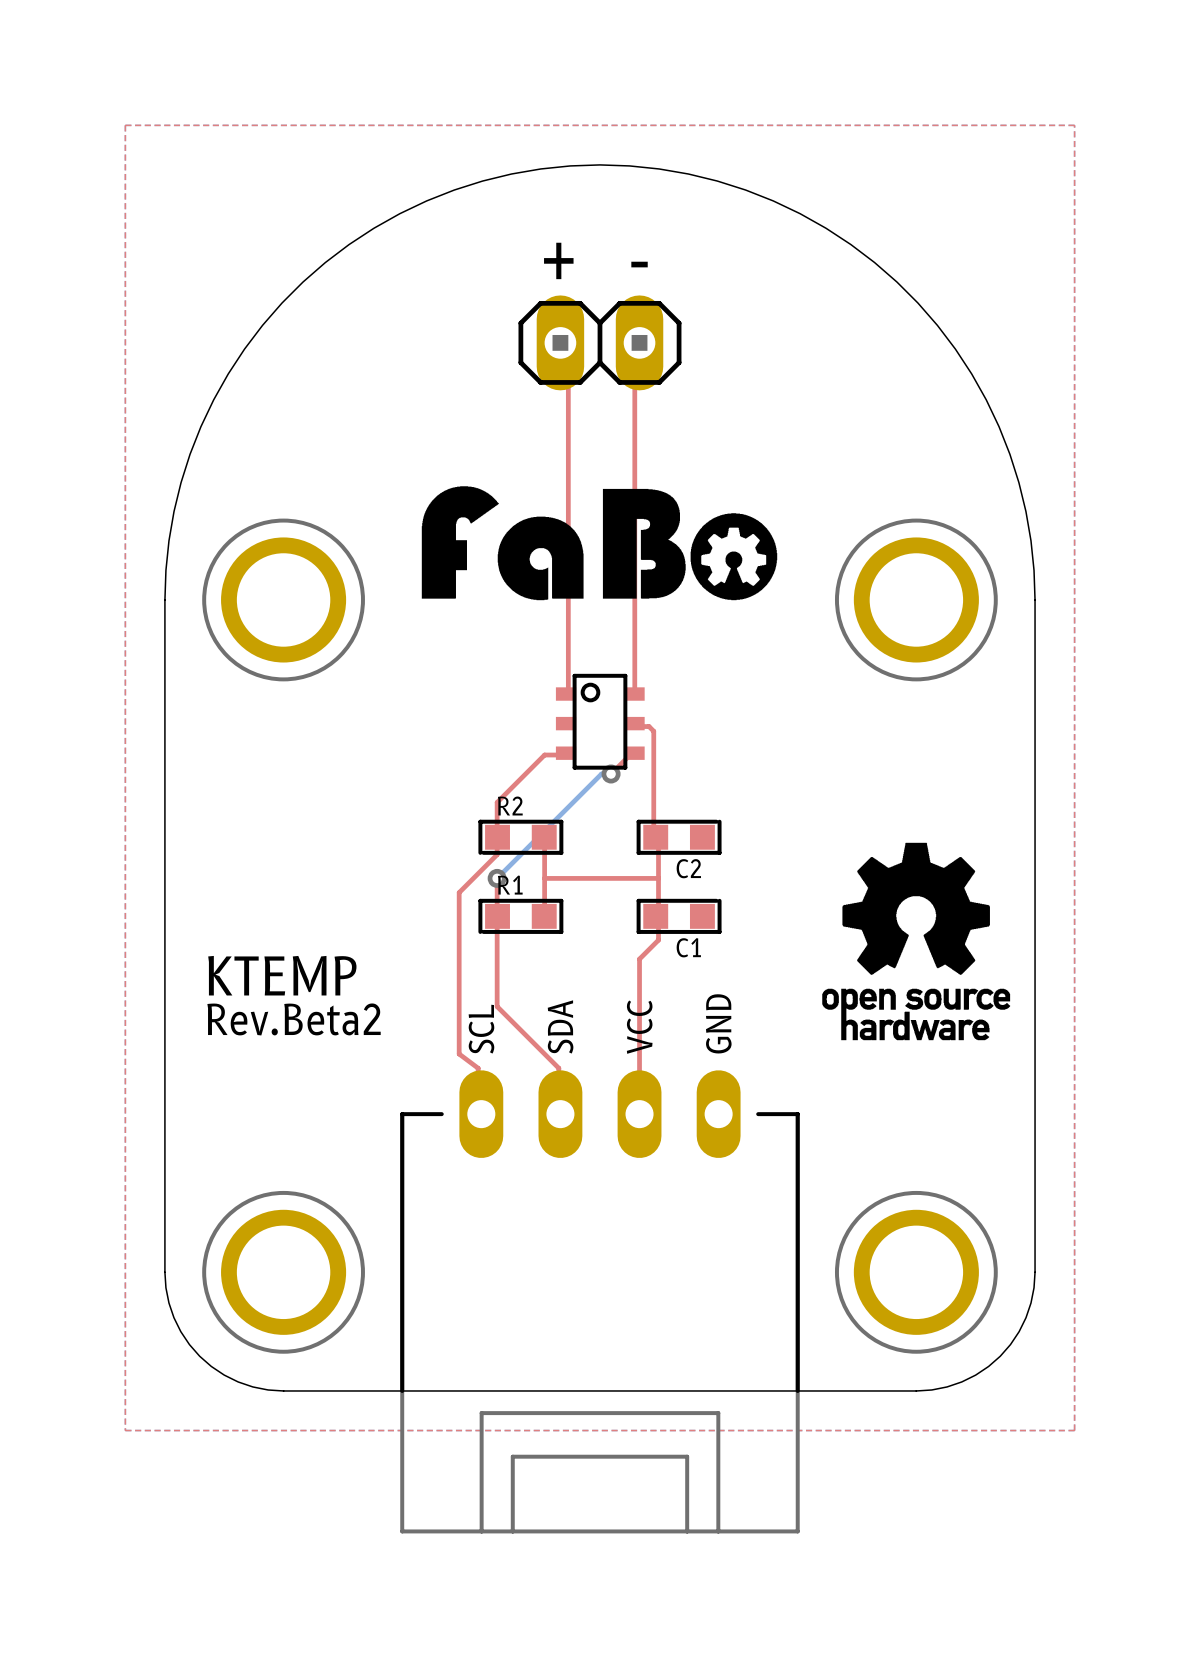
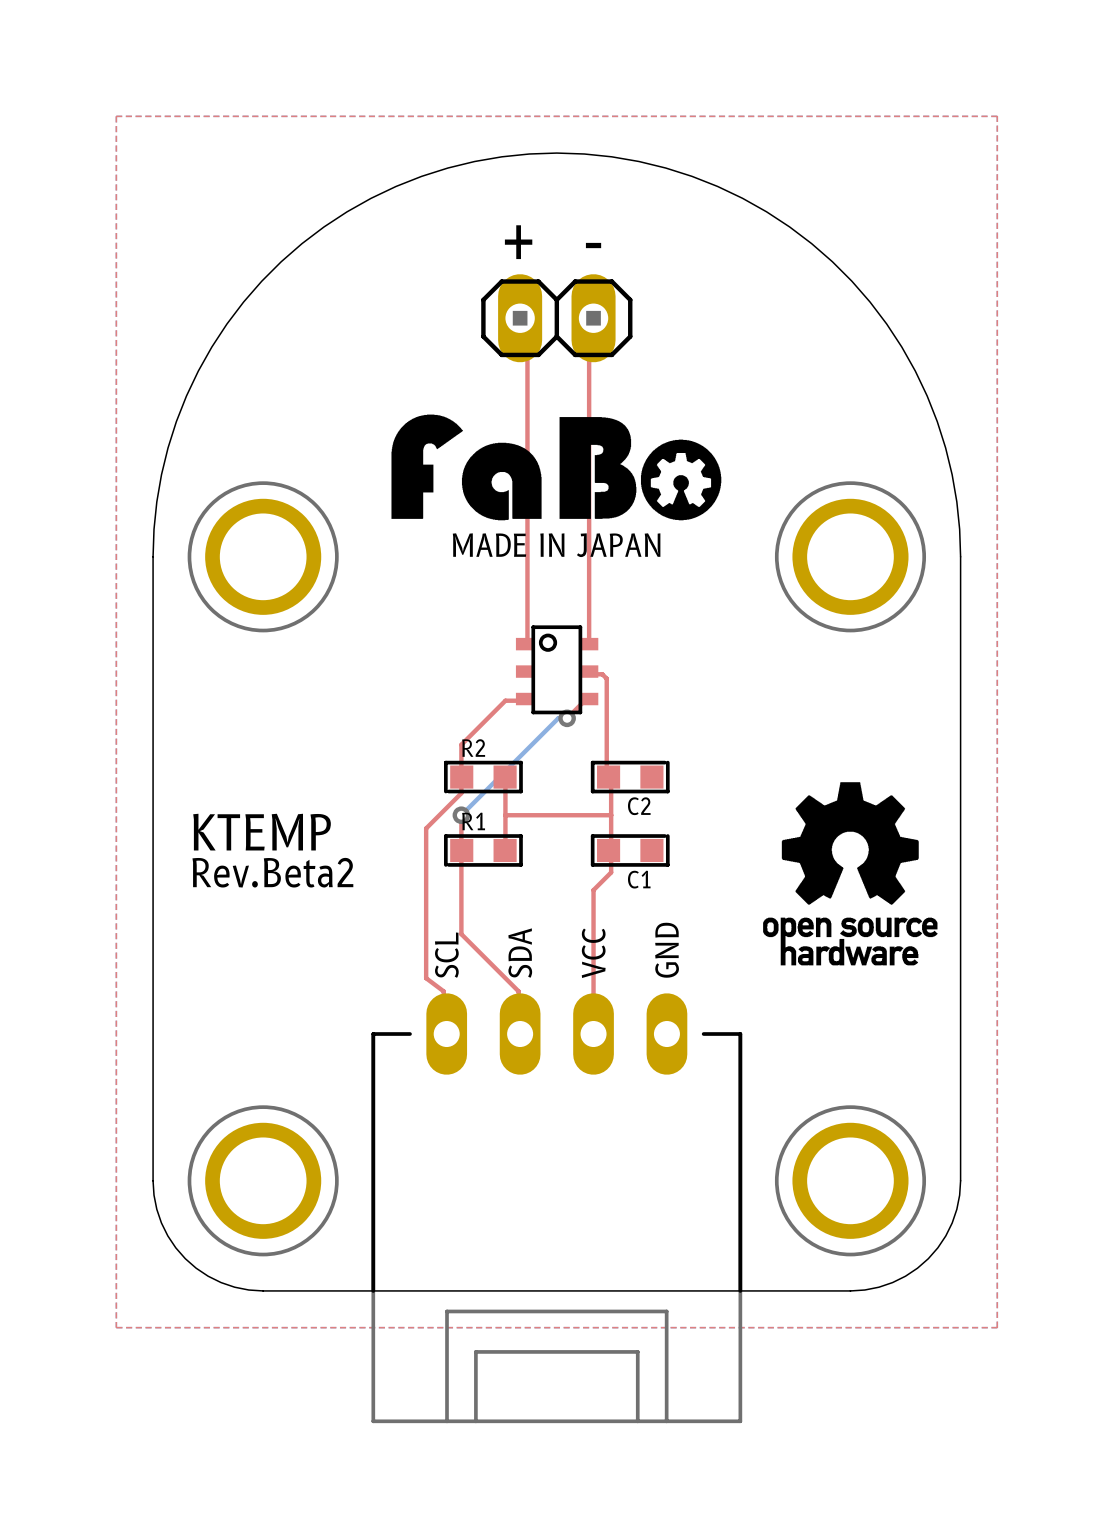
drawing position: (599, 543) -> (556, 467)
text: none -> MADE IN JAPAN (556, 545)
text position: KTEMP (282, 975) -> KTEMP (262, 832)
text position: Rev.Beta2 (294, 1019) -> Rev.Beta2 (272, 872)

